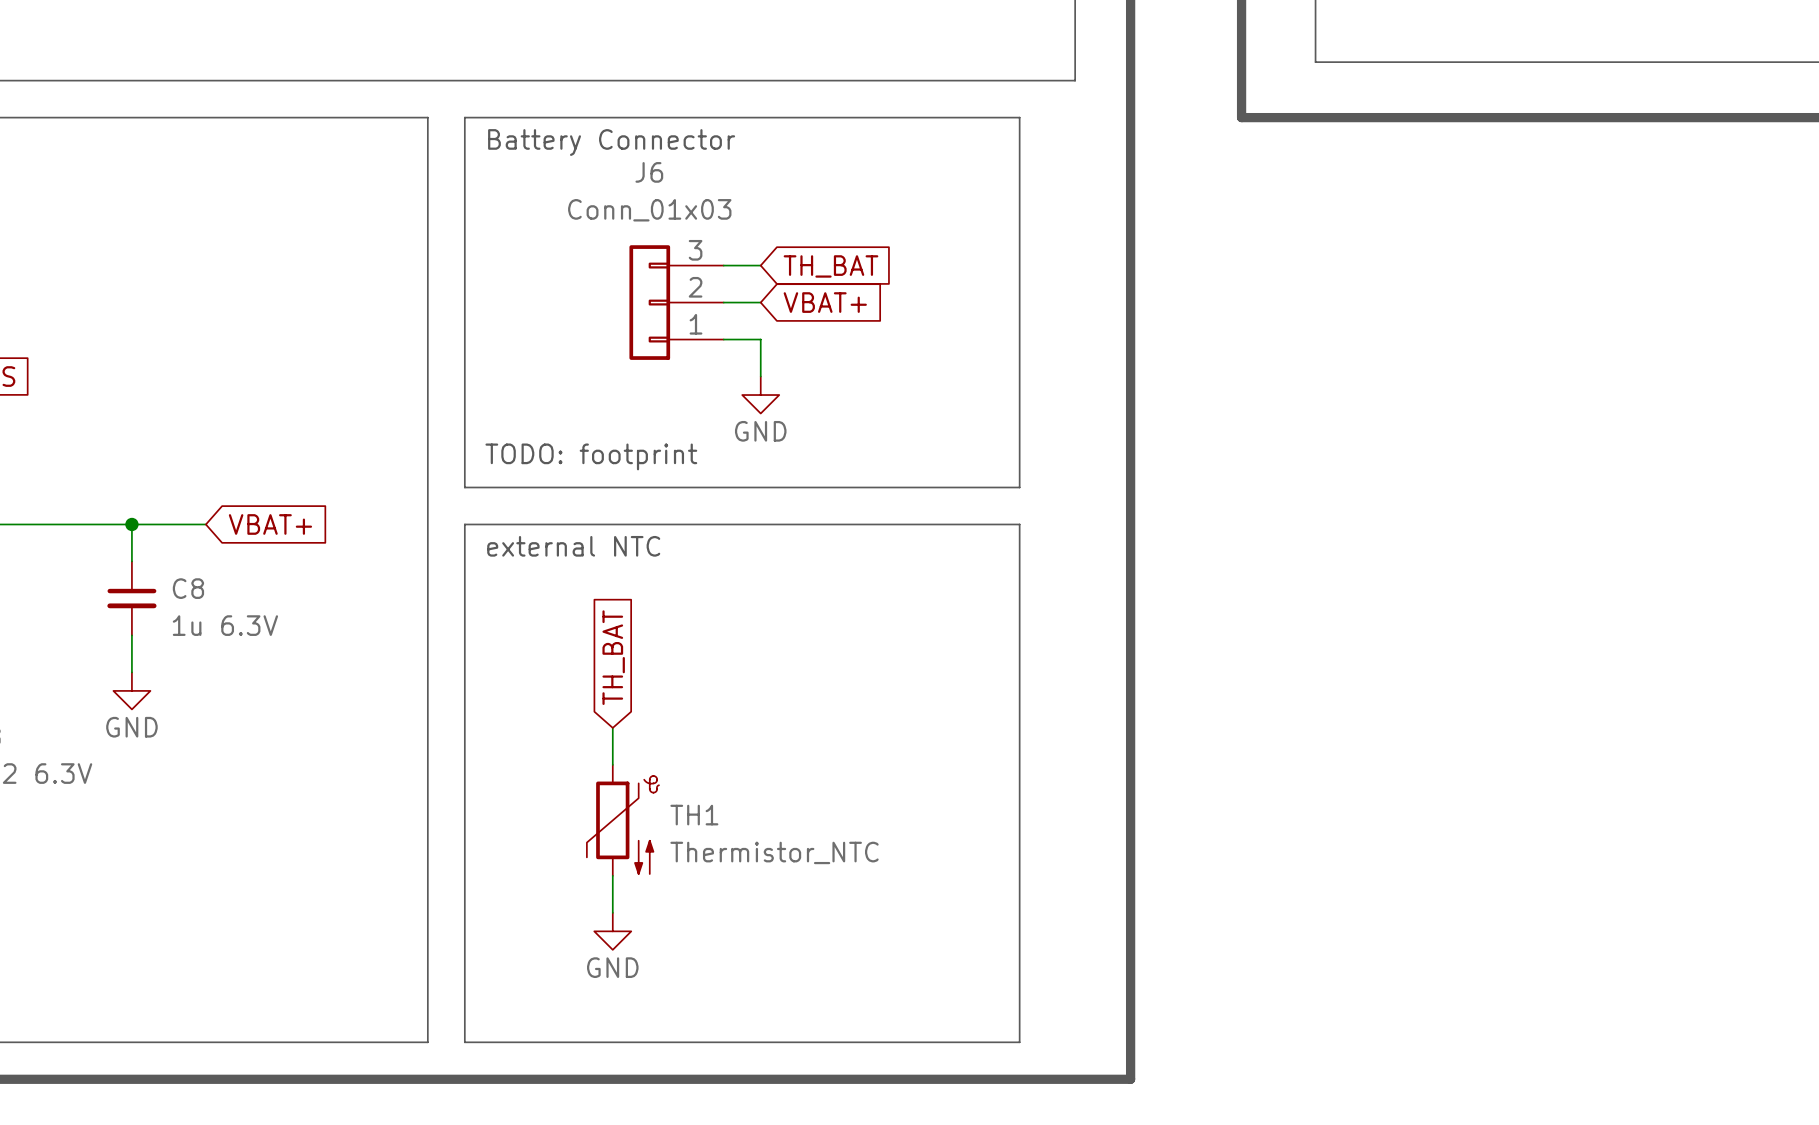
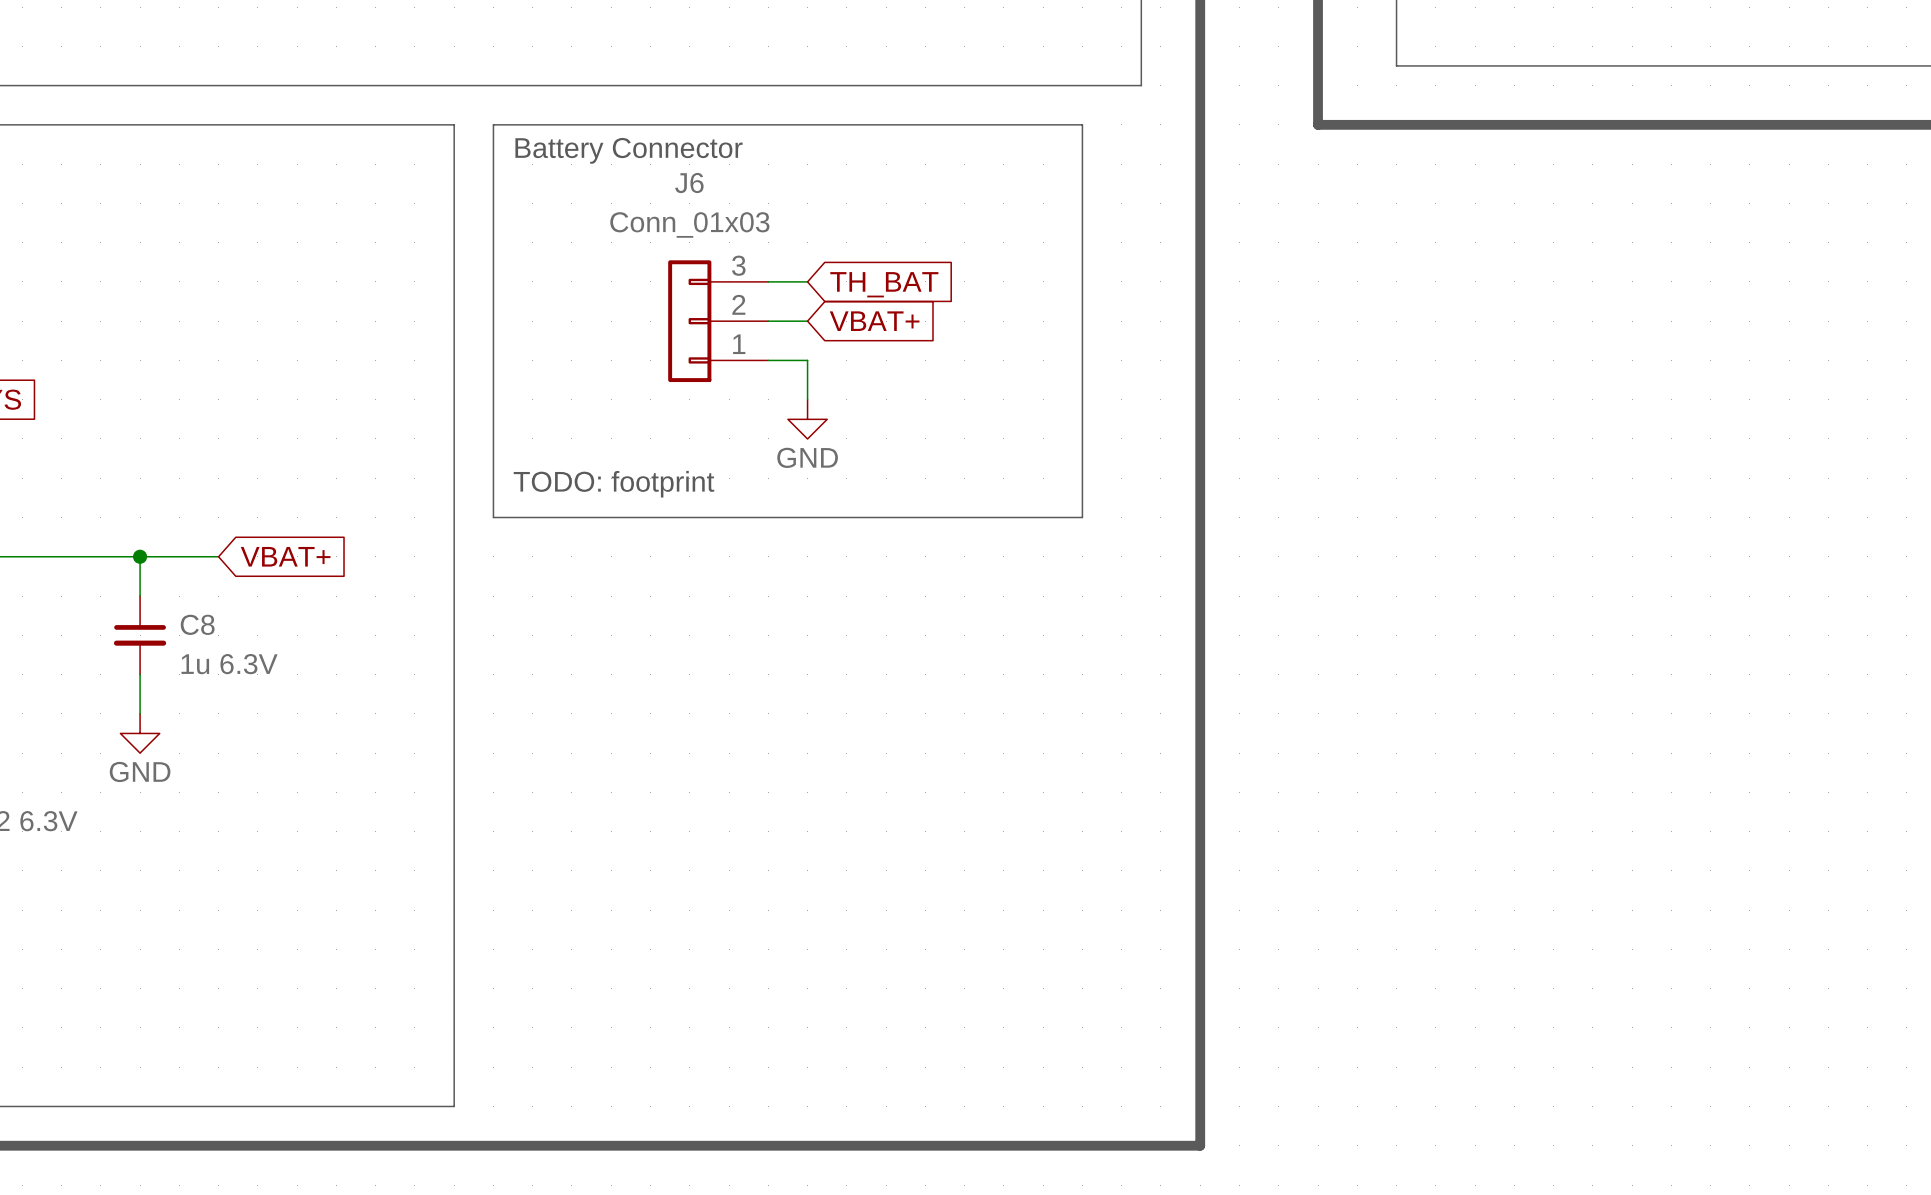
line: (464, 524) (464, 1042) (1019, 1042) (1019, 524) (464, 524) -> none
text: external NTC (573, 546) -> none
global label: TH_BAT (613, 657) -> none
wire: (612, 727) (612, 764) -> none
TH1: Thermistor_NTC (622, 820) -> none
wire: (612, 875) (612, 912) -> none
power symbol: GND (612, 931) -> none

